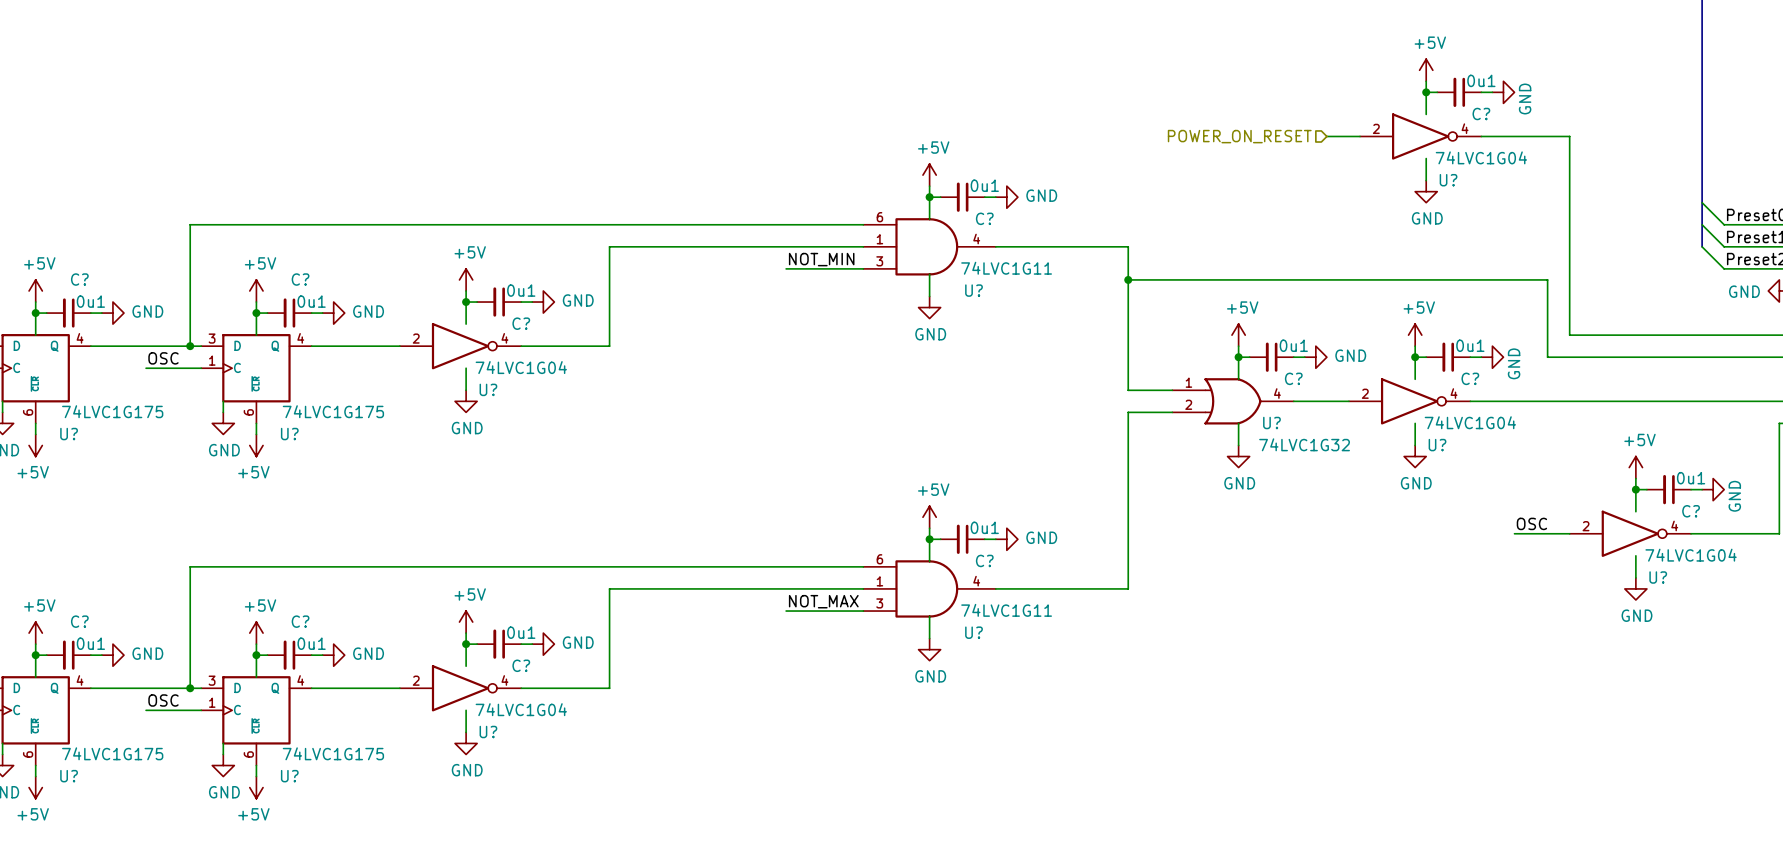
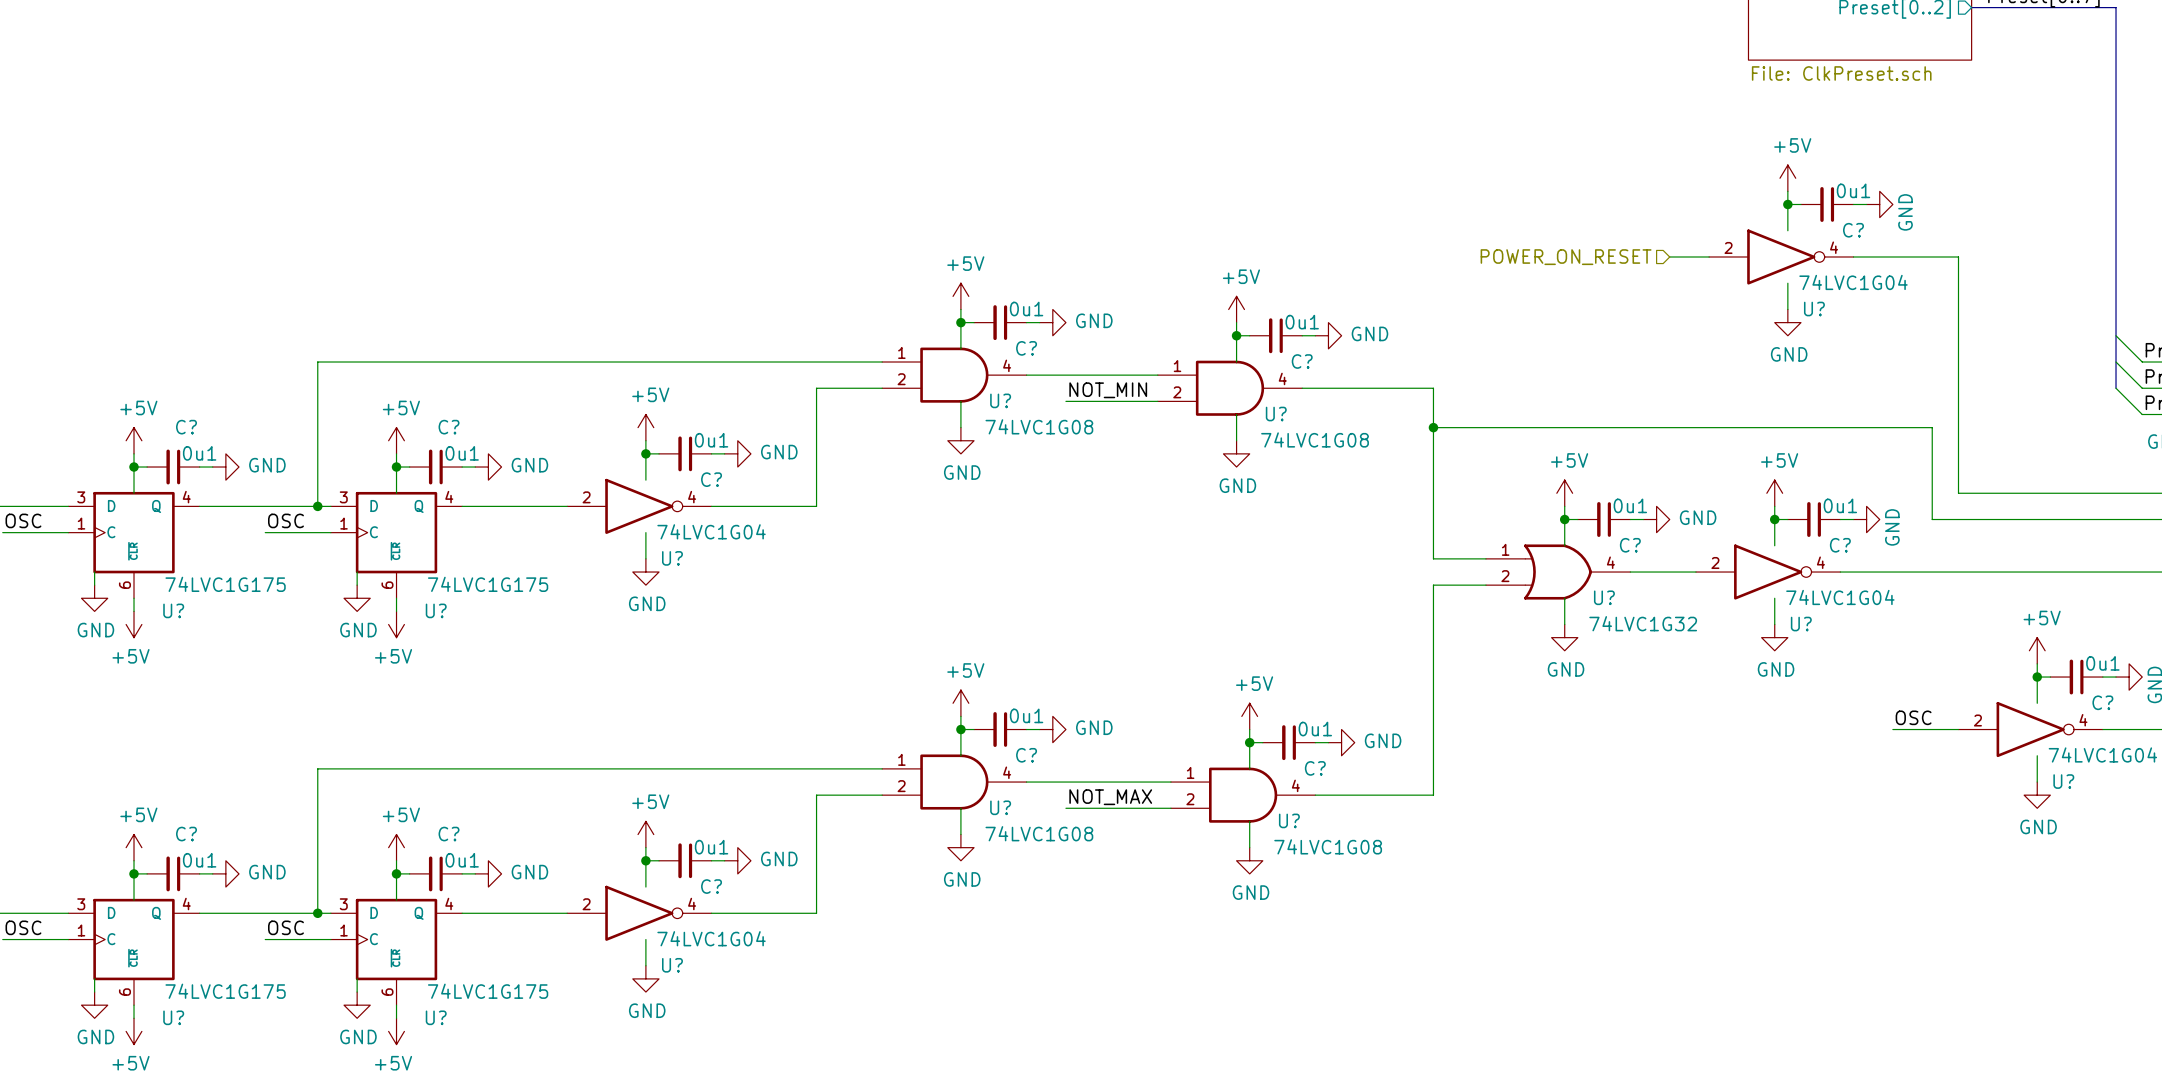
power symbol: none -> +5V (960, 296)
power symbol position: +5V (929, 175) -> +5V (1236, 309)
wire: (929, 186) (929, 219) -> (960, 309) (960, 348)
junction: none -> (960, 322)
C?: none -> 0u1 (1000, 322)
power symbol: none -> GND (1052, 322)
wire: none -> (1236, 322) (1236, 362)
wire: (929, 197) (940, 197) -> (960, 322) (974, 322)
junction position: (929, 197) -> (1236, 335)
C? position: (962, 197) -> (1275, 335)
wire: (984, 197) (995, 197) -> (1026, 322) (1039, 322)
power symbol position: GND (1006, 197) -> GND (1328, 335)
wire: none -> (1236, 335) (1249, 335)
wire: none -> (1302, 335) (1315, 335)
wire: (664, 224) (863, 224) -> none
U?: none -> 74LVC1G08 (954, 375)
wire: none -> (1026, 375) (1157, 375)
wire: (664, 246) (863, 246) -> none
U?: 74LVC1G11 (929, 246) -> none
U?: none -> 74LVC1G08 (1230, 388)
label position: NOT_MIN (821, 259) -> NOT_MIN (1108, 390)
wire: (786, 268) (863, 268) -> (1065, 401) (1157, 401)
wire: none -> (1236, 414) (1236, 440)
wire: (929, 274) (929, 296) -> (960, 401) (960, 427)
power symbol: none -> GND (960, 440)
power symbol position: GND (929, 307) -> GND (1236, 453)
power symbol: none -> +5V (960, 703)
power symbol position: +5V (929, 517) -> +5V (1249, 716)
wire: (929, 528) (929, 561) -> (960, 716) (960, 755)
junction: none -> (960, 729)
C?: none -> 0u1 (1000, 729)
power symbol: none -> GND (1052, 729)
wire: none -> (1249, 729) (1249, 768)
wire: (929, 539) (940, 539) -> (960, 729) (974, 729)
junction position: (929, 539) -> (1249, 742)
C? position: (962, 539) -> (1289, 742)
wire: (984, 539) (995, 539) -> (1026, 729) (1039, 729)
power symbol position: GND (1006, 539) -> GND (1341, 742)
wire: none -> (1249, 742) (1262, 742)
wire: none -> (1315, 742) (1328, 742)
wire: (664, 566) (863, 566) -> none
U?: none -> 74LVC1G08 (954, 782)
wire: none -> (1026, 782) (1170, 782)
wire: (664, 588) (863, 588) -> none
U?: 74LVC1G11 (929, 588) -> none
U?: none -> 74LVC1G08 (1243, 795)
wire: none -> (1065, 808) (1170, 808)
label position: NOT_MAX (823, 601) -> NOT_MAX (1110, 797)
wire: (786, 611) (863, 611) -> none
wire: none -> (1249, 821) (1249, 847)
wire: (929, 616) (929, 638) -> (960, 808) (960, 834)
power symbol: none -> GND (960, 847)
power symbol position: GND (929, 649) -> GND (1249, 860)

